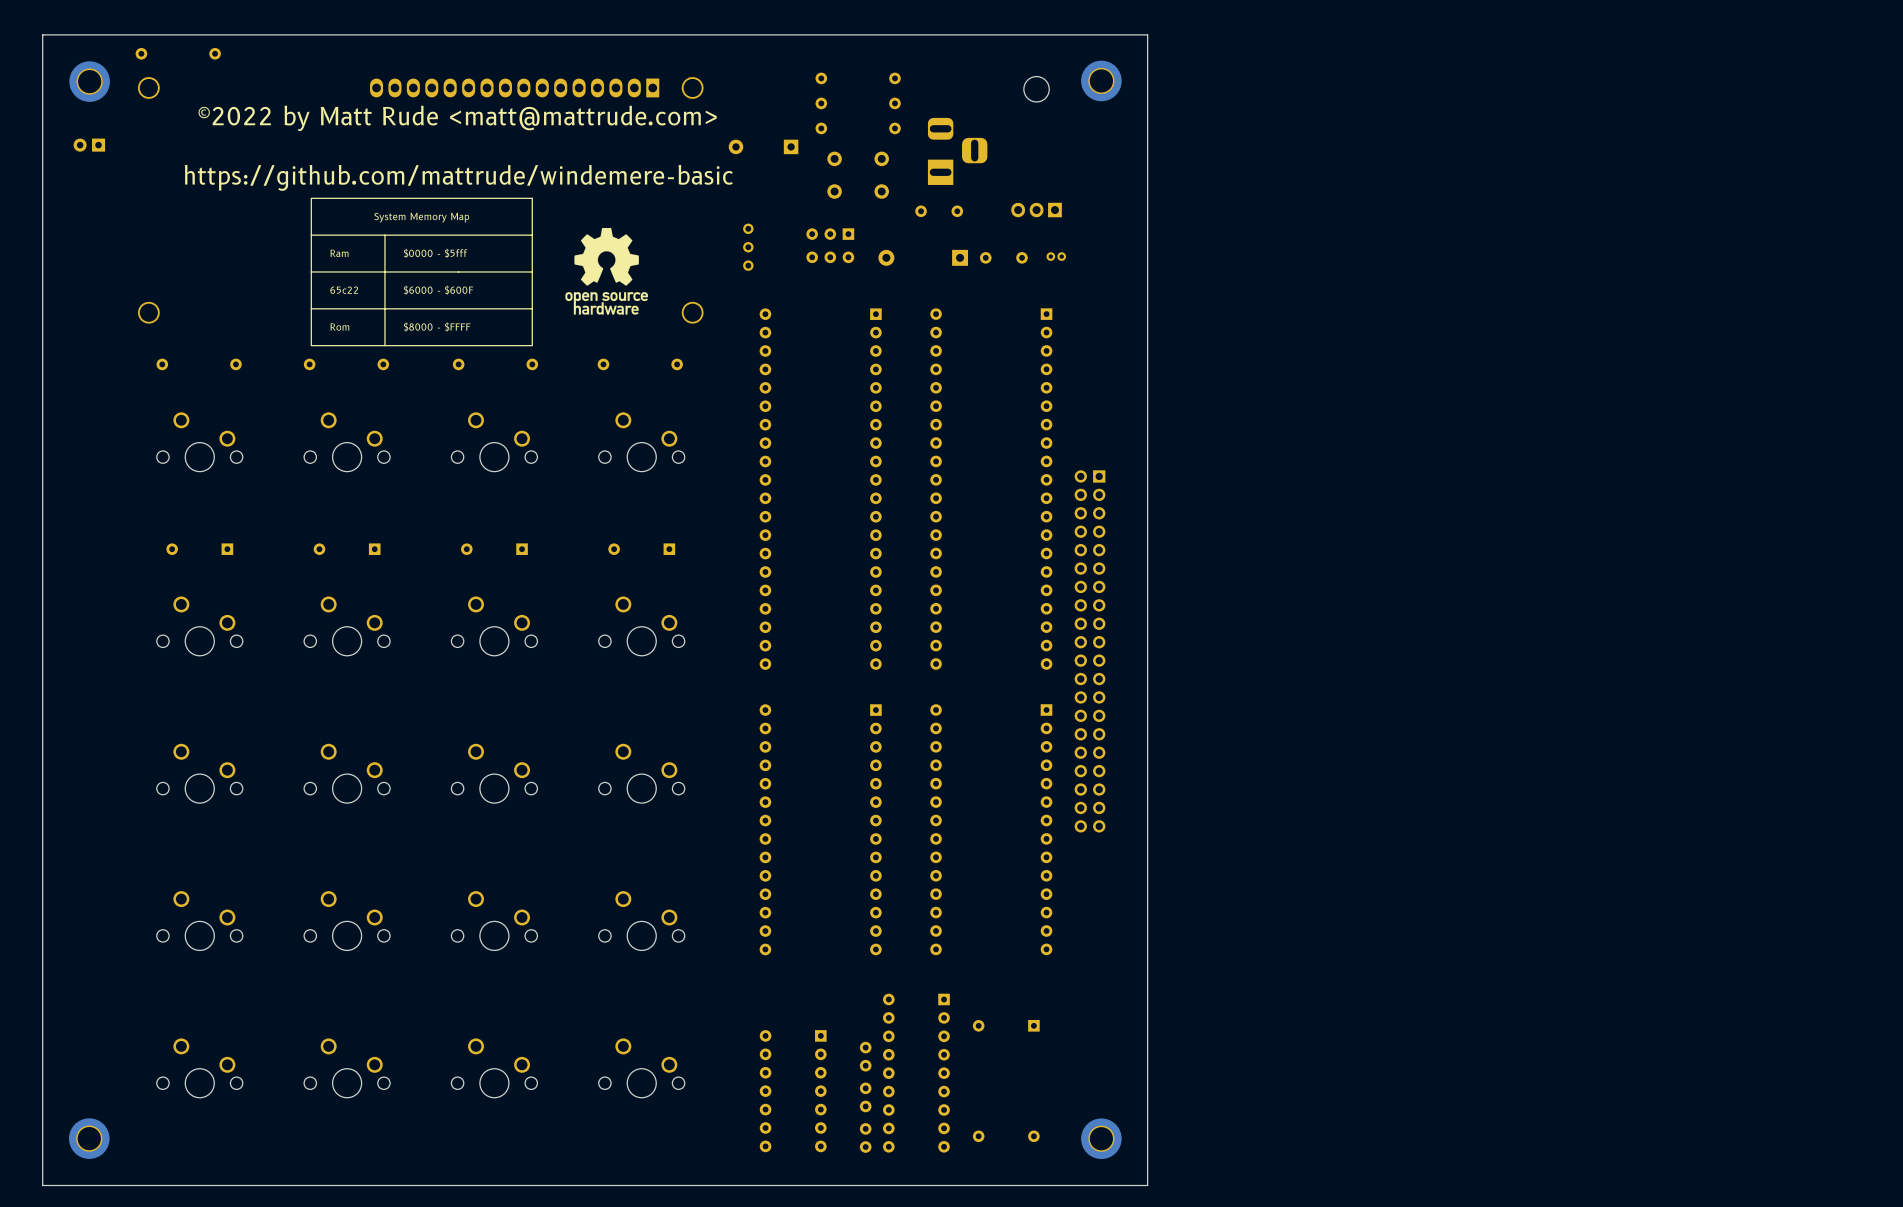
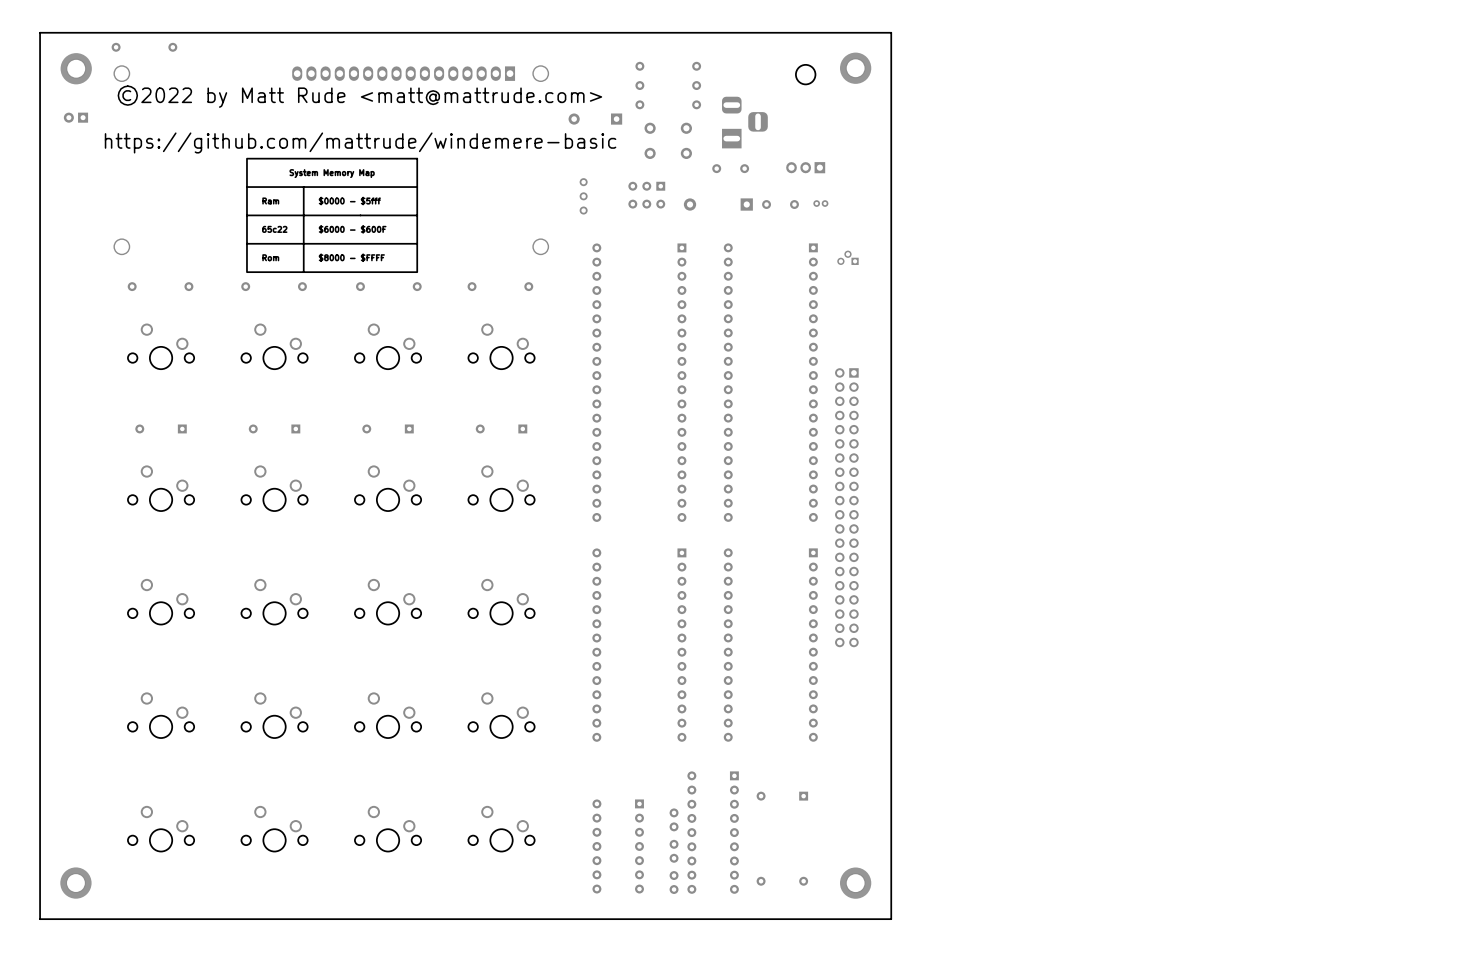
drawing: [565, 227, 648, 315] -> none
part: none -> (847, 257)

